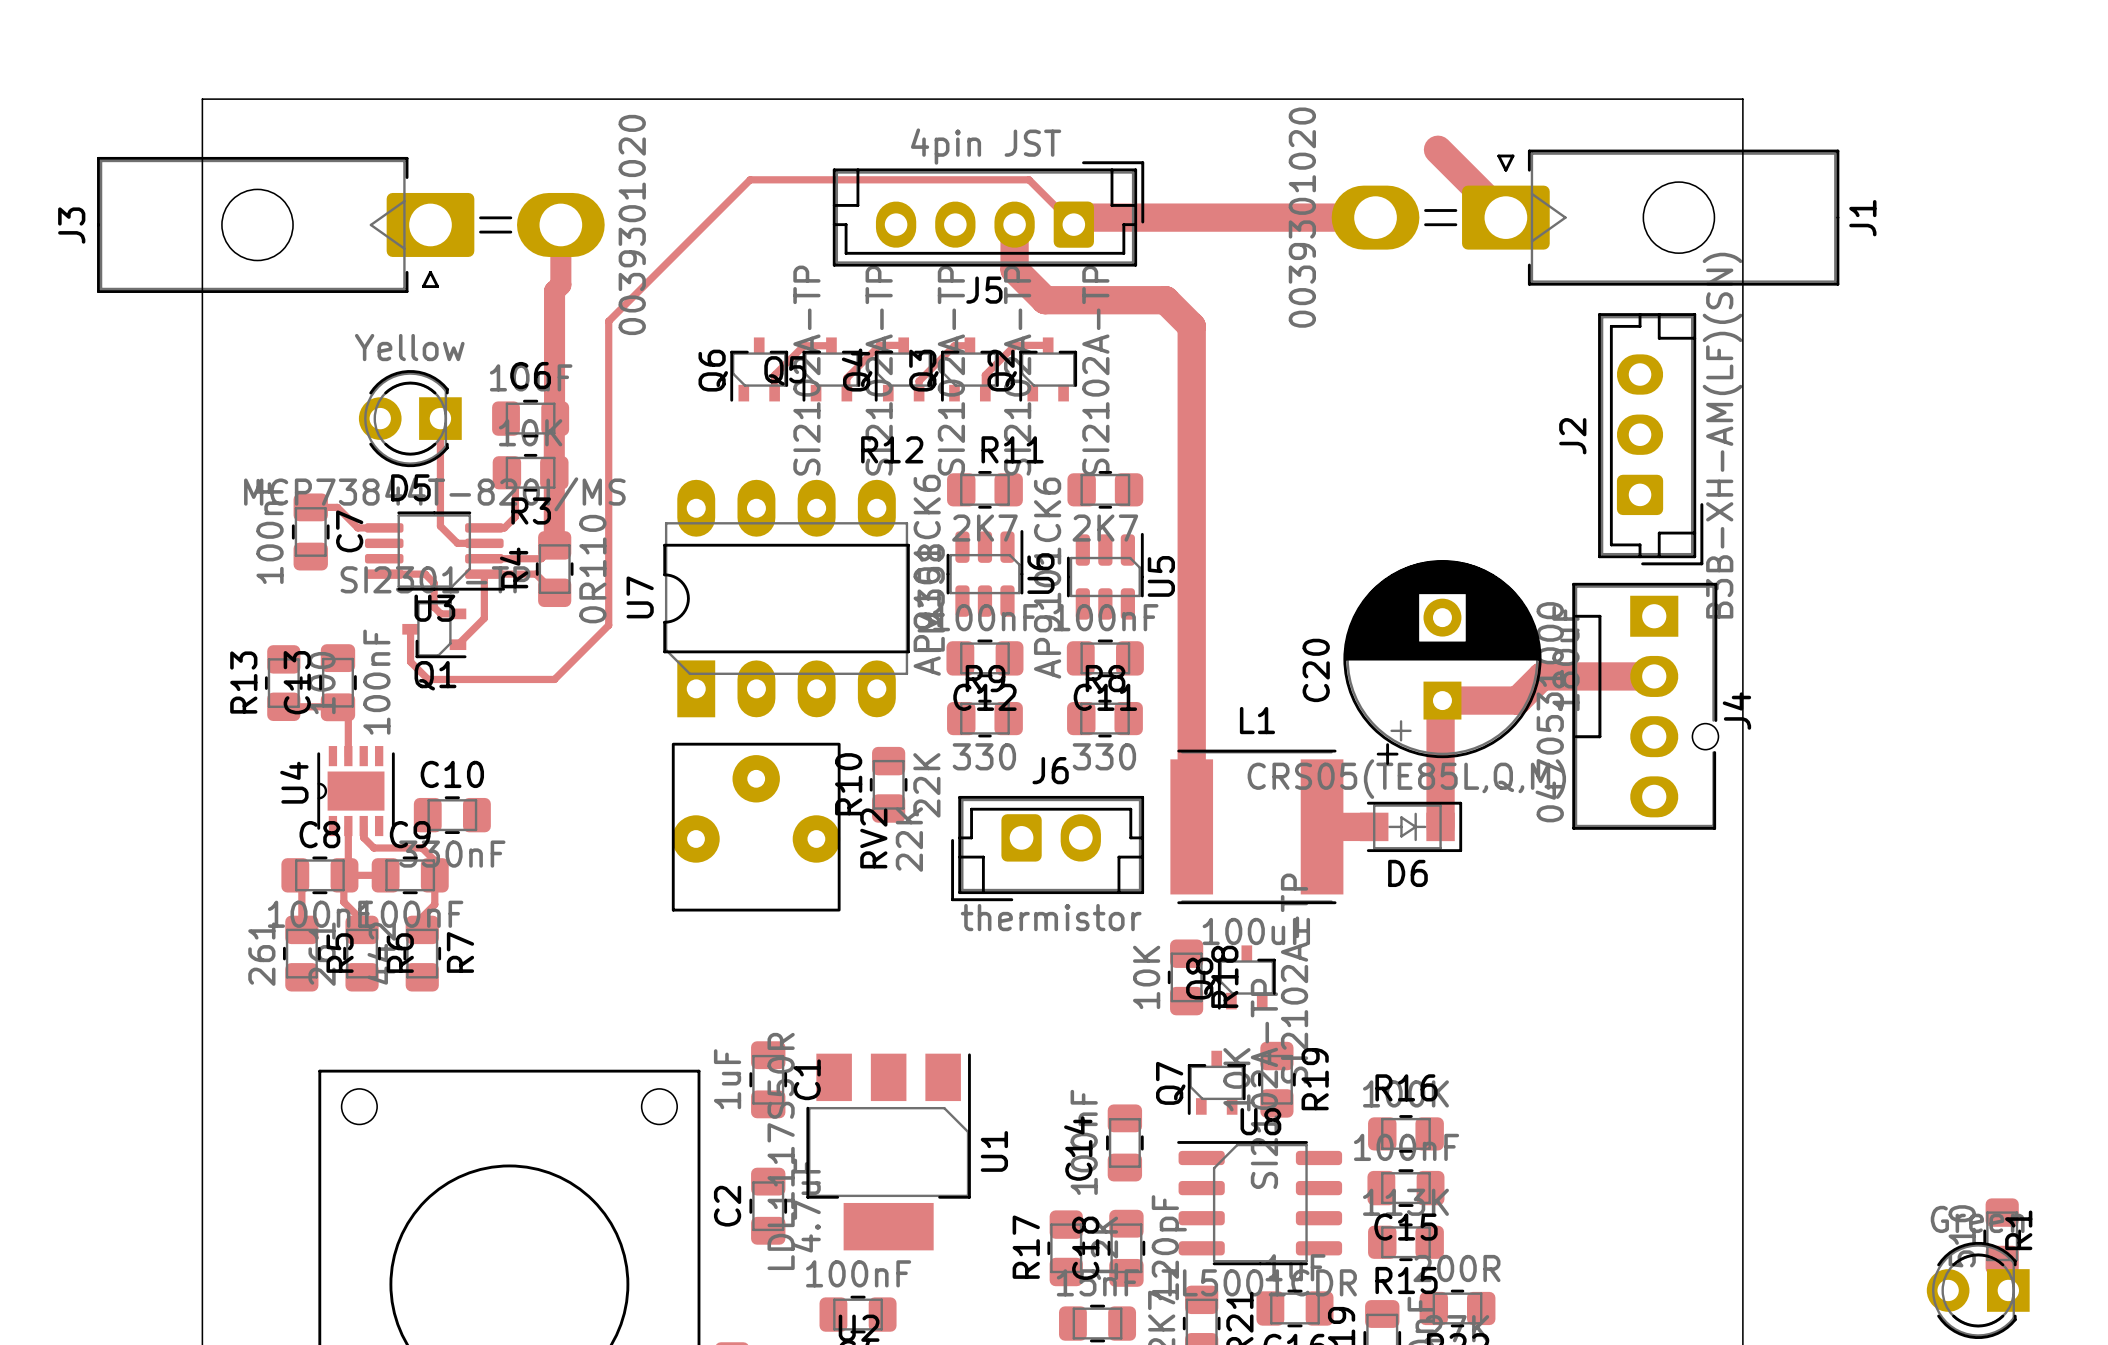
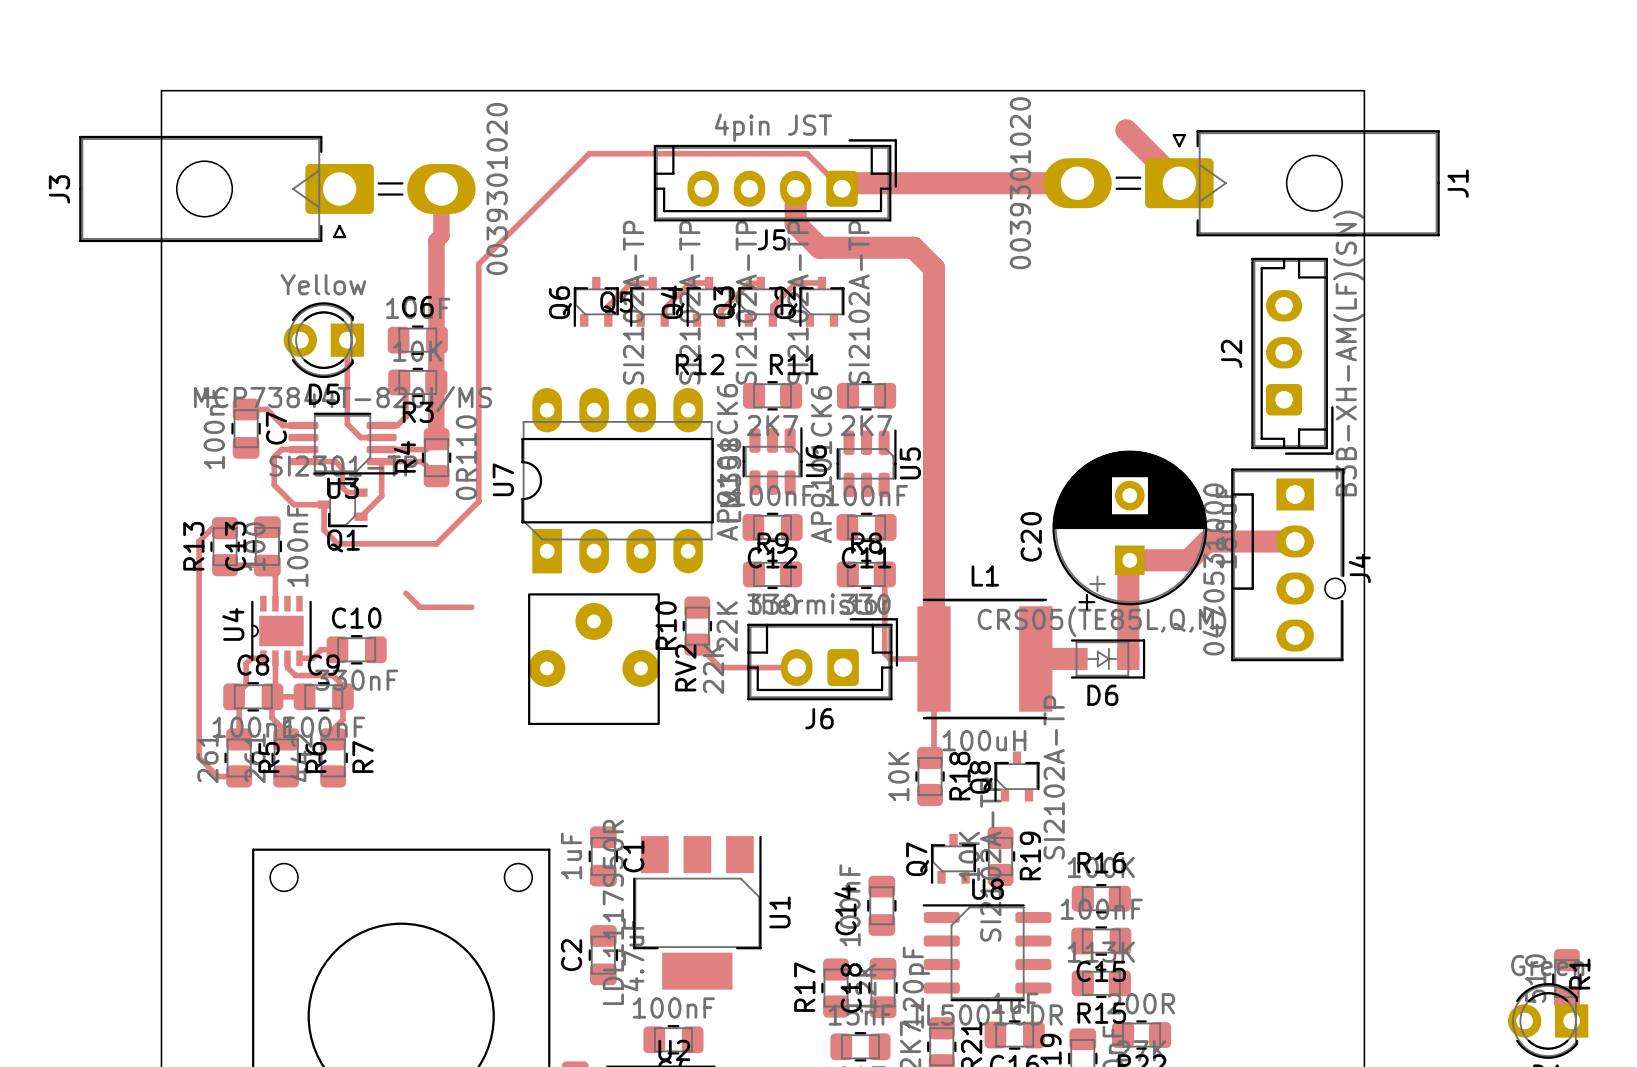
top track: none -> (303, 449) (281, 449) (274, 456) (274, 485) (293, 504) (324, 504)
top track: none -> (225, 528) (212, 528) (199, 541) (199, 757) (217, 776) (239, 776)
top track: none -> (884, 574) (884, 653) (890, 659) (934, 658) (934, 757)
top track: none -> (405, 593) (420, 607) (471, 607)
top track: none -> (697, 644) (720, 667) (796, 667)
top track: none -> (337, 649) (321, 649) (312, 658) (299, 658)
top track: none -> (263, 658) (251, 658) (246, 663) (246, 684) (234, 696)
J6 rotation: 0° (1047, 848) -> 180° (822, 659)
Q8 position: (1246, 977) -> (1016, 776)

